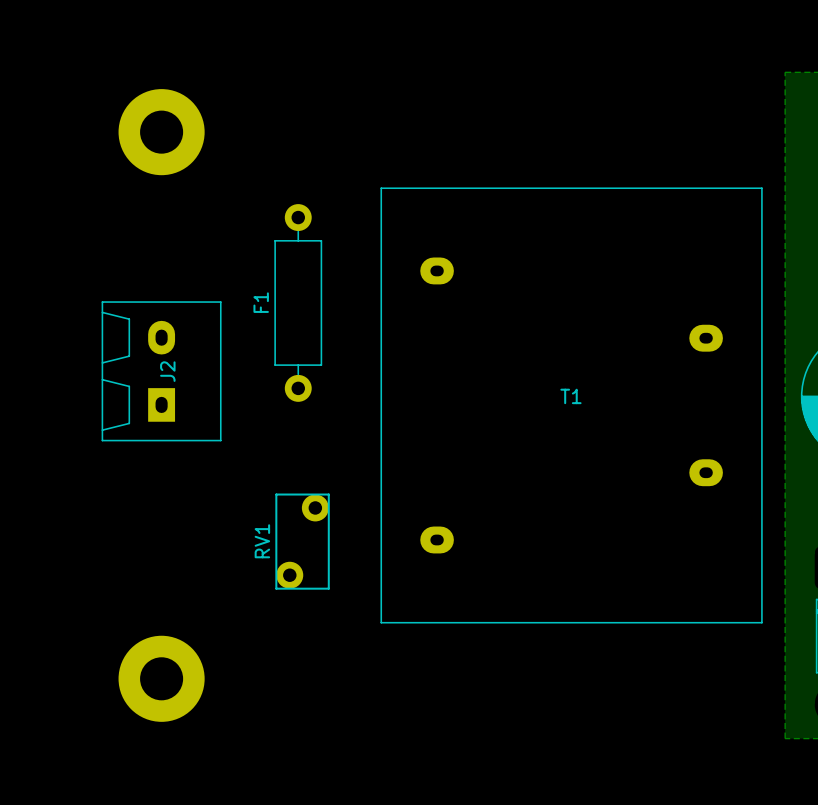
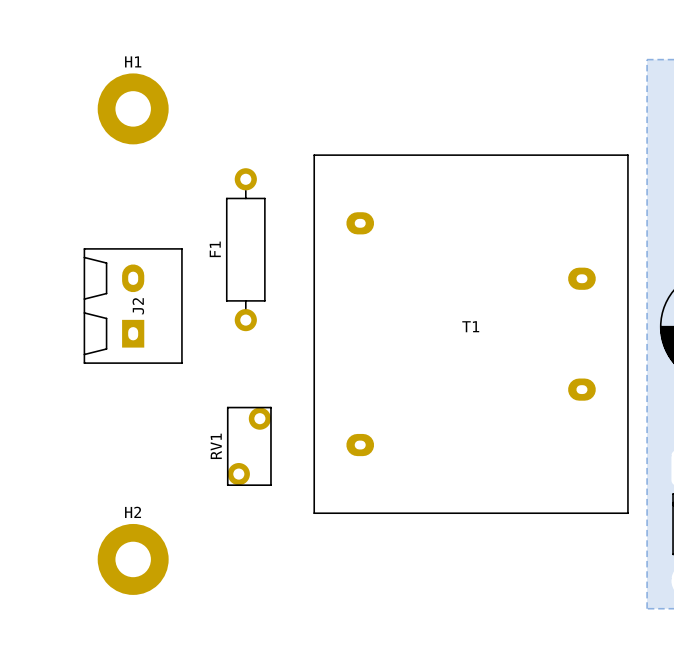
H1 name: none -> H1 (133, 61)
H2 name: none -> H2 (133, 512)

